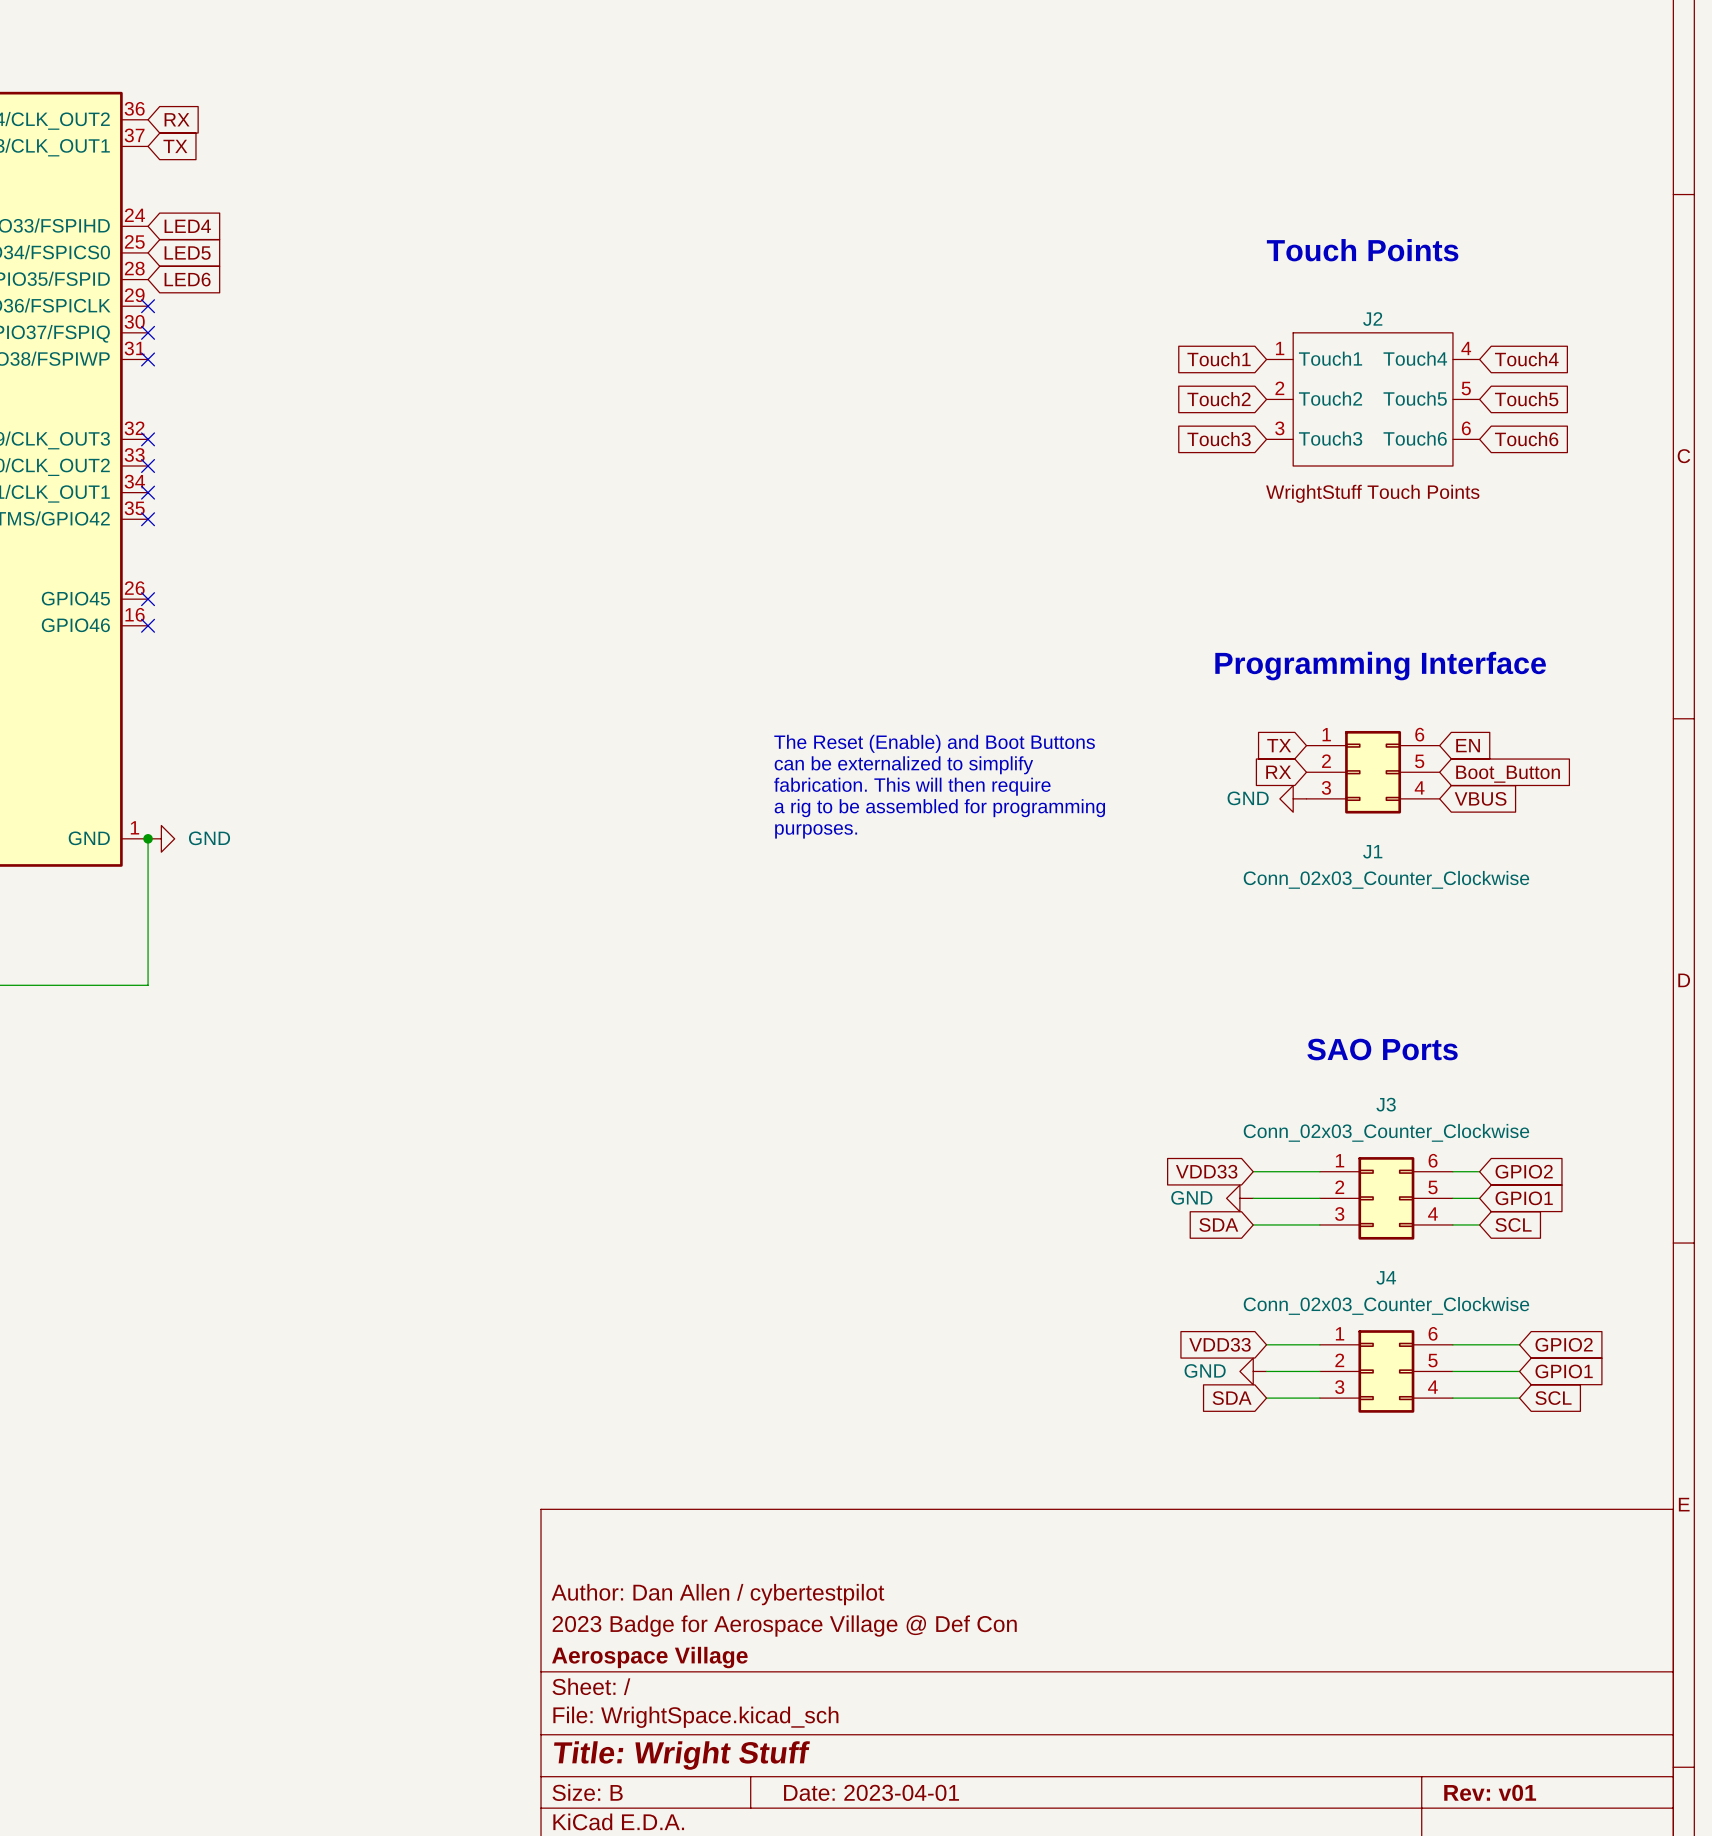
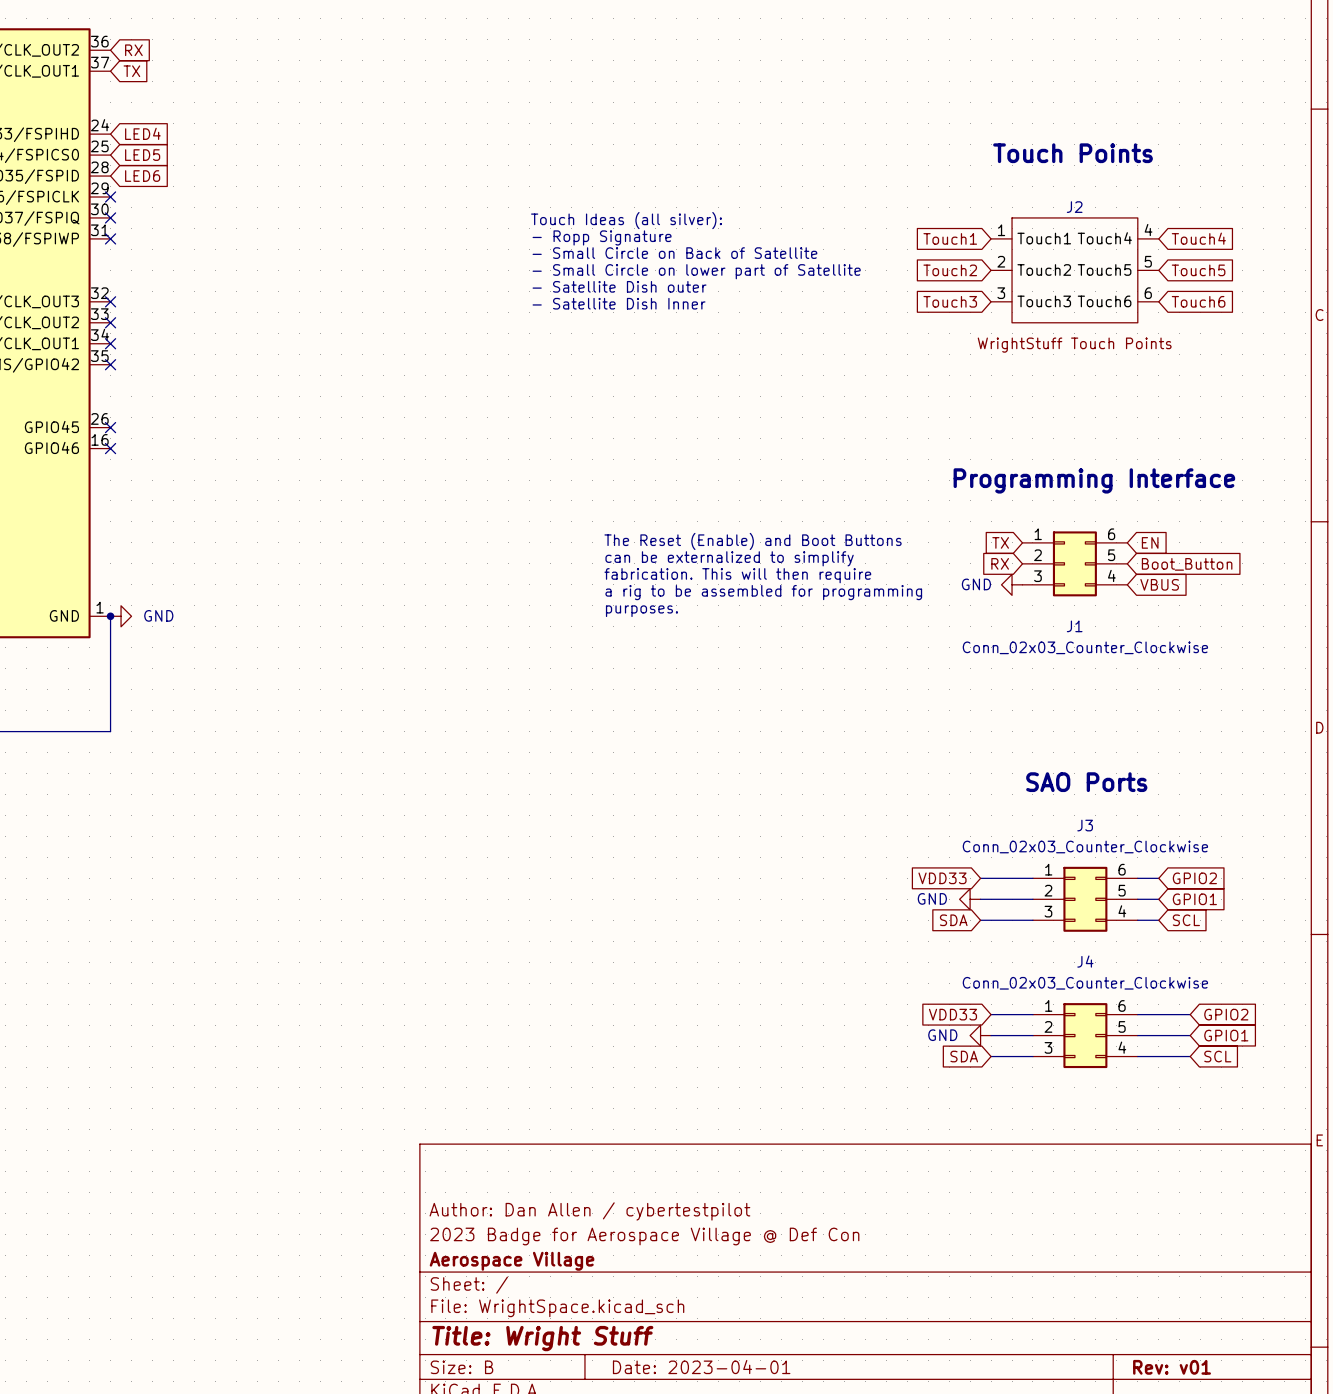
text: none -> Touch Ideas (all silver): (626, 220)
text: none -> - Ropp Signature (602, 237)
text: none -> - Small Circle on Back of Satellite (674, 253)
text: none -> - Small Circle on lower part of Satellite (696, 271)
text: none -> - Satellite Dish outer (619, 286)
text: none -> - Satellite Dish Inner (619, 303)

